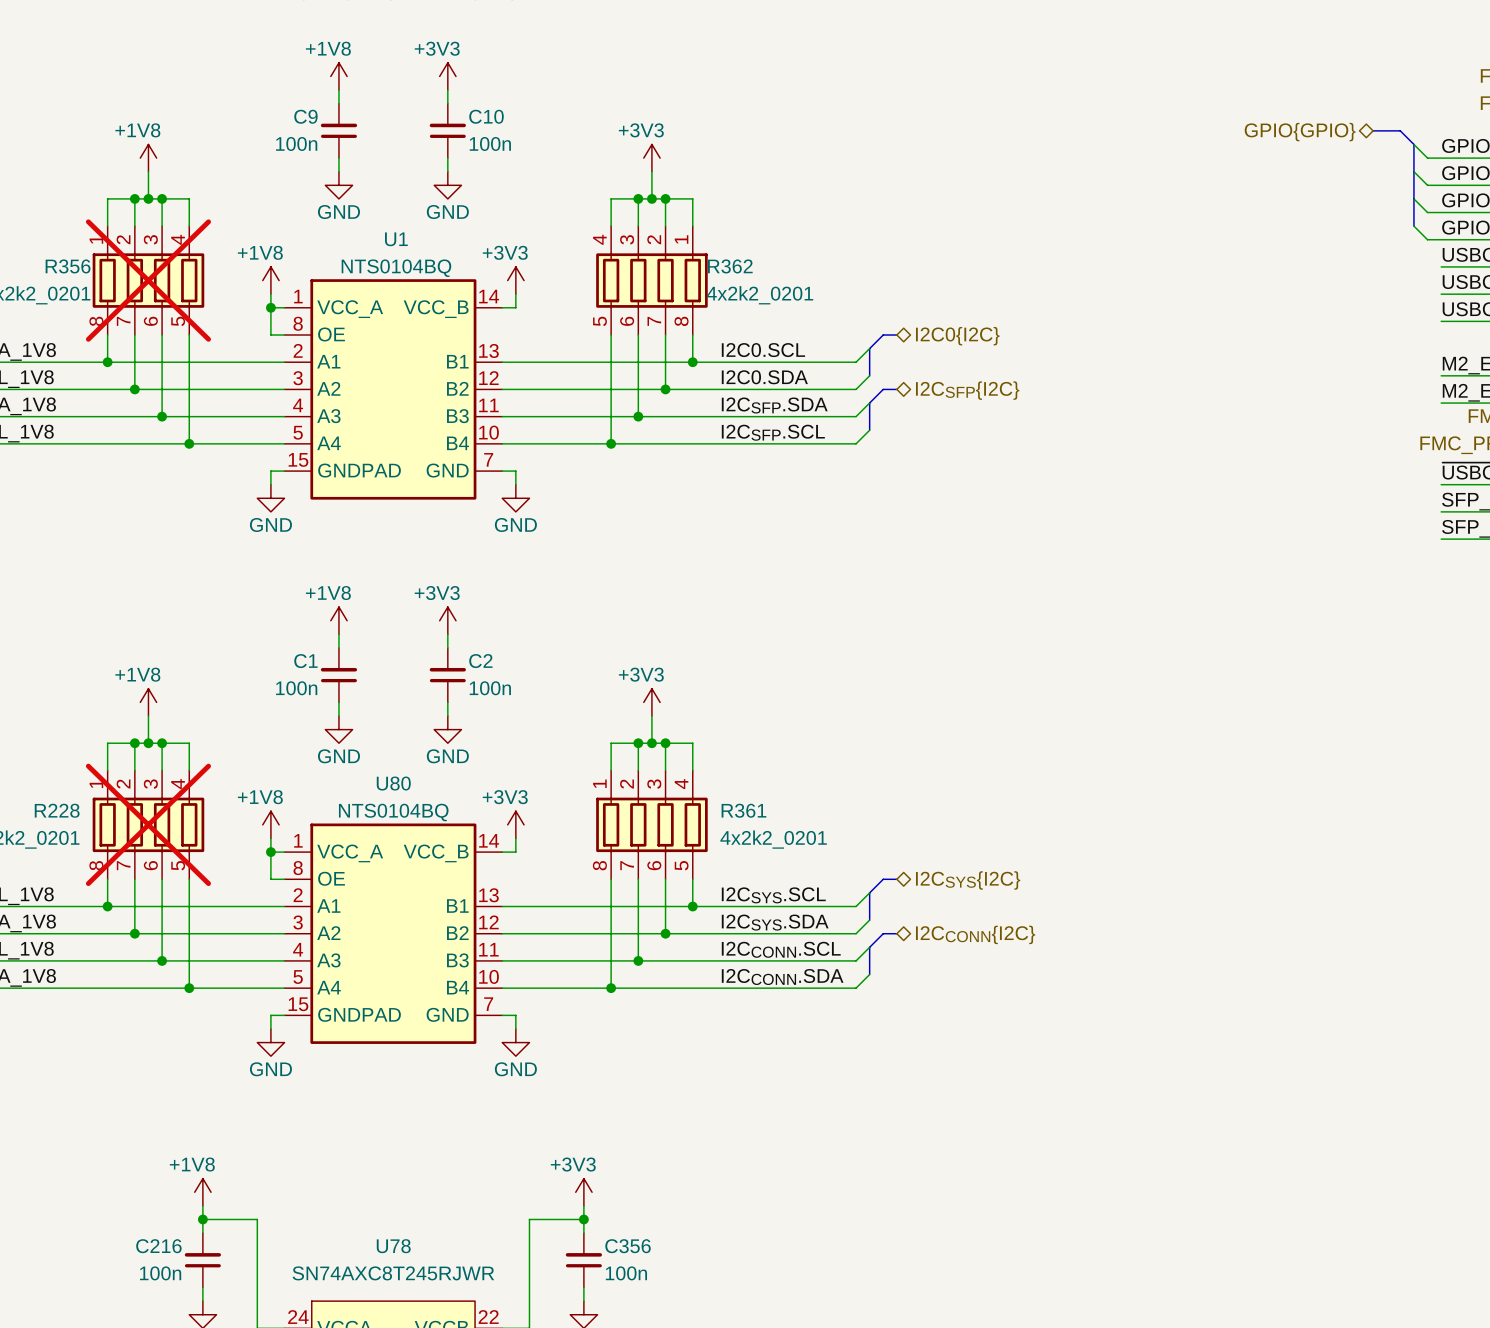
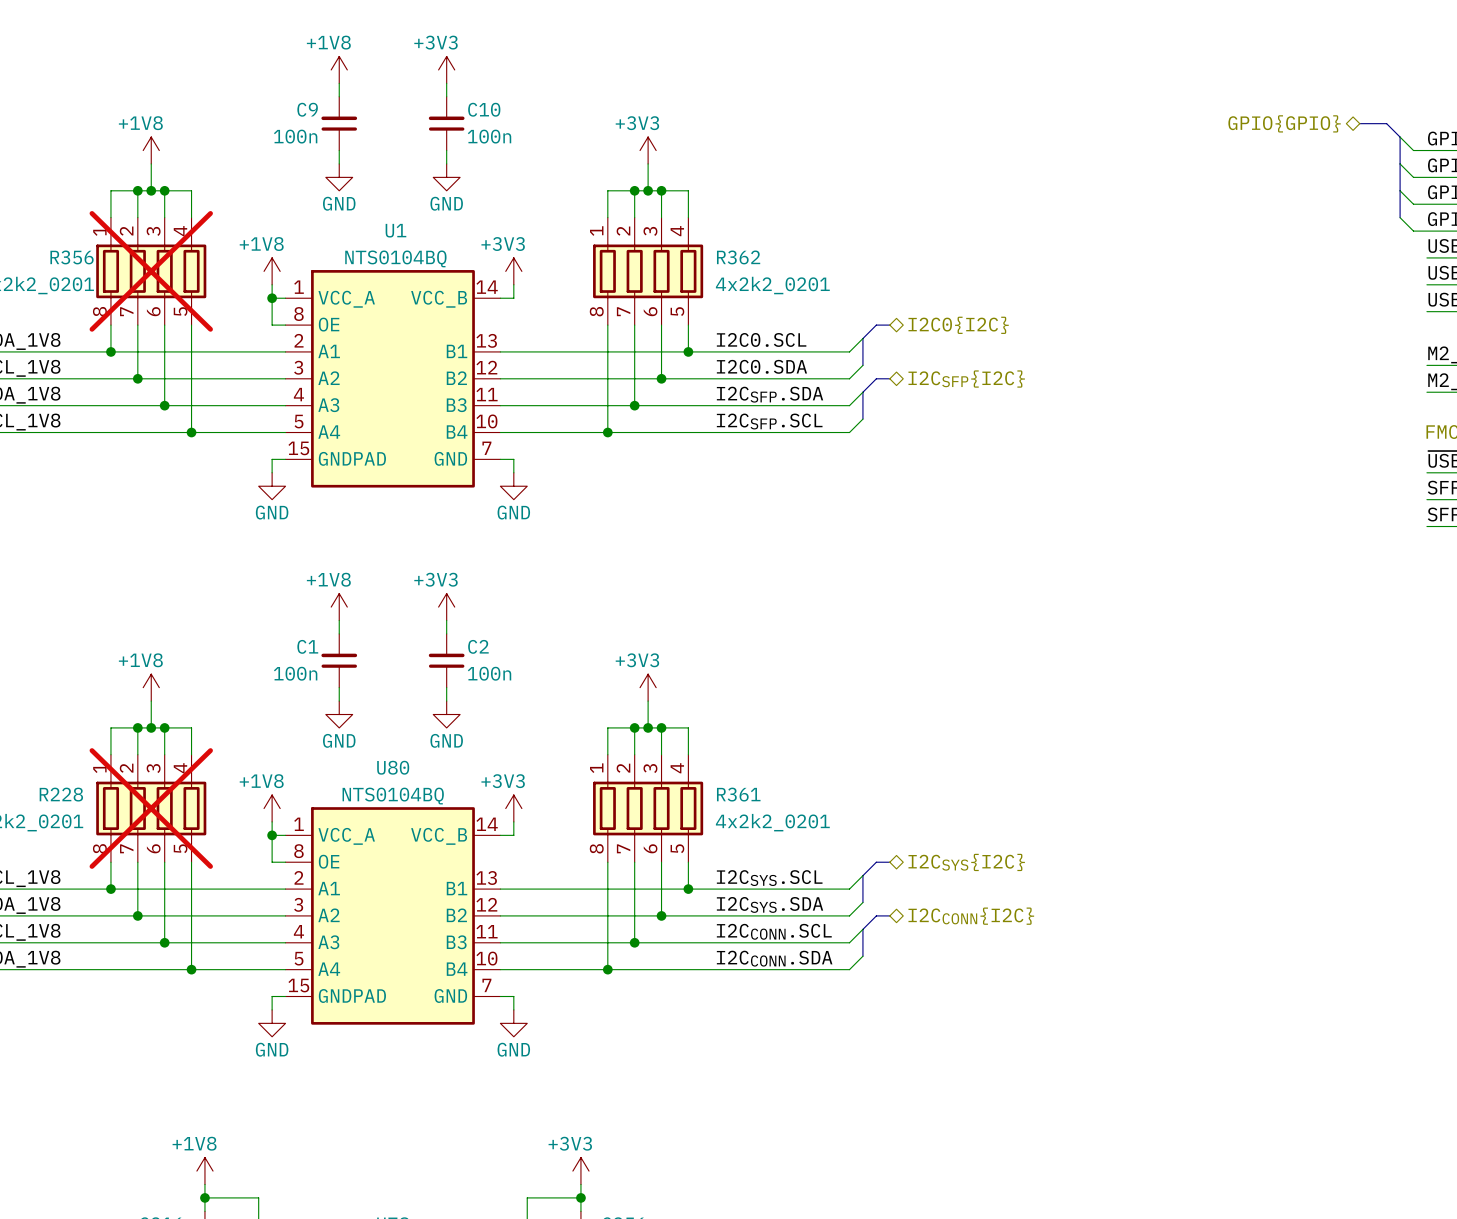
R362 flip: as is (651, 280) -> left-right (648, 271)

